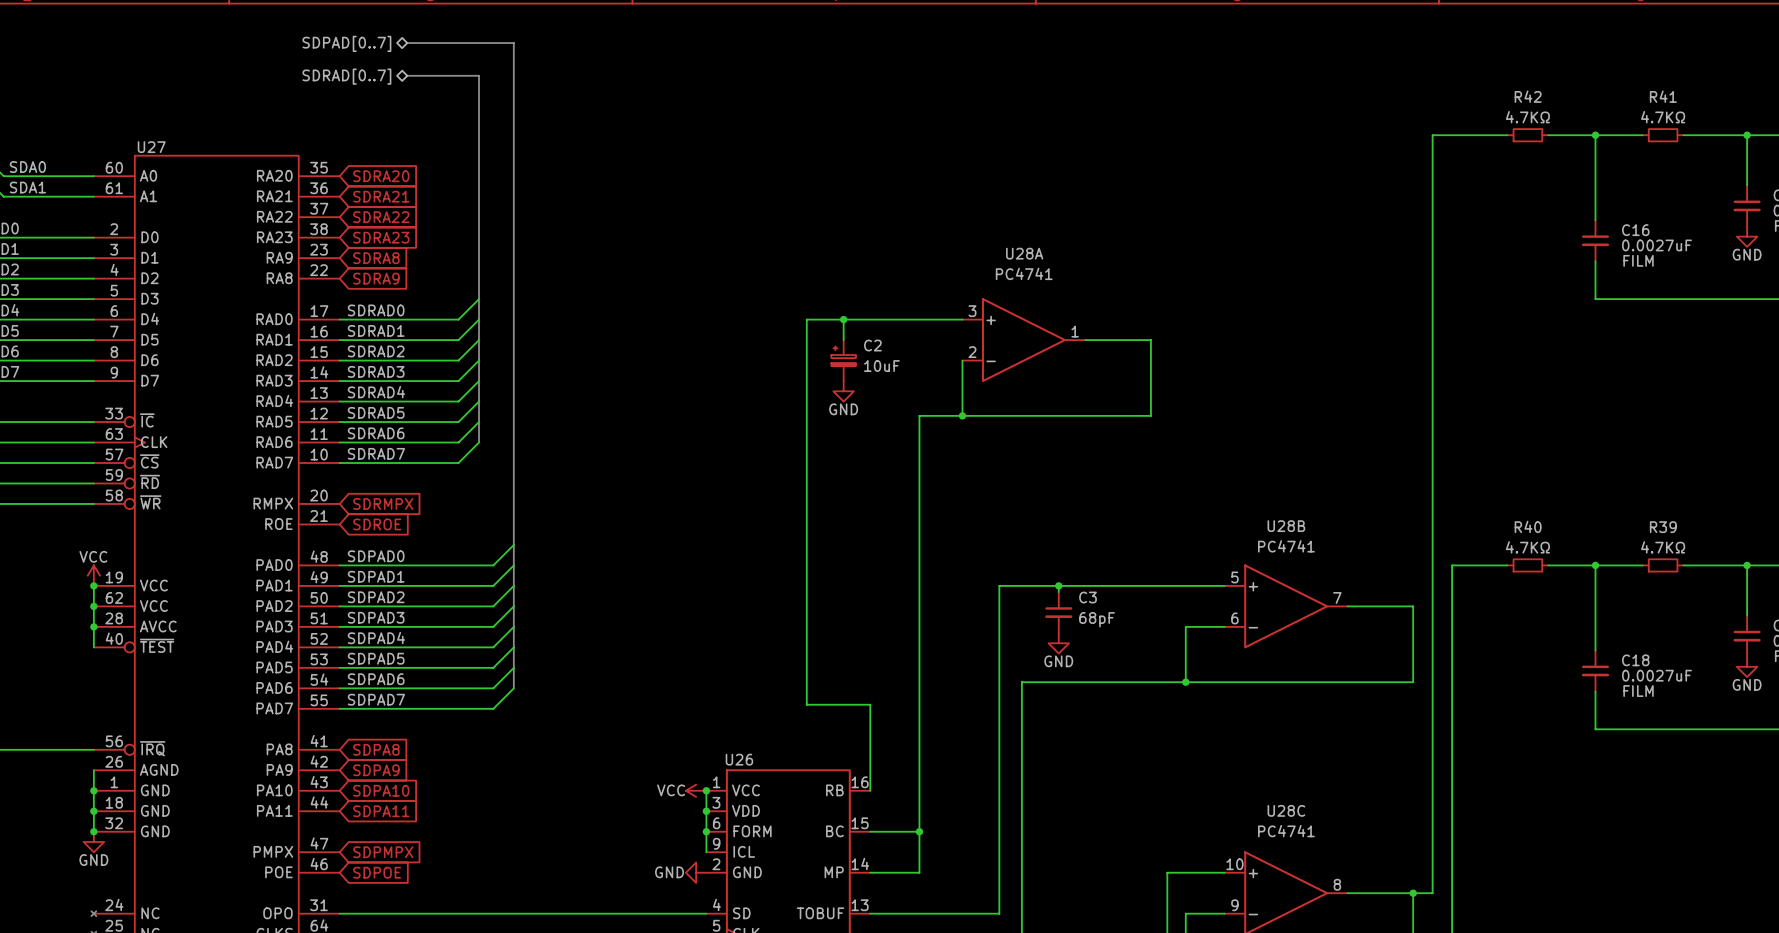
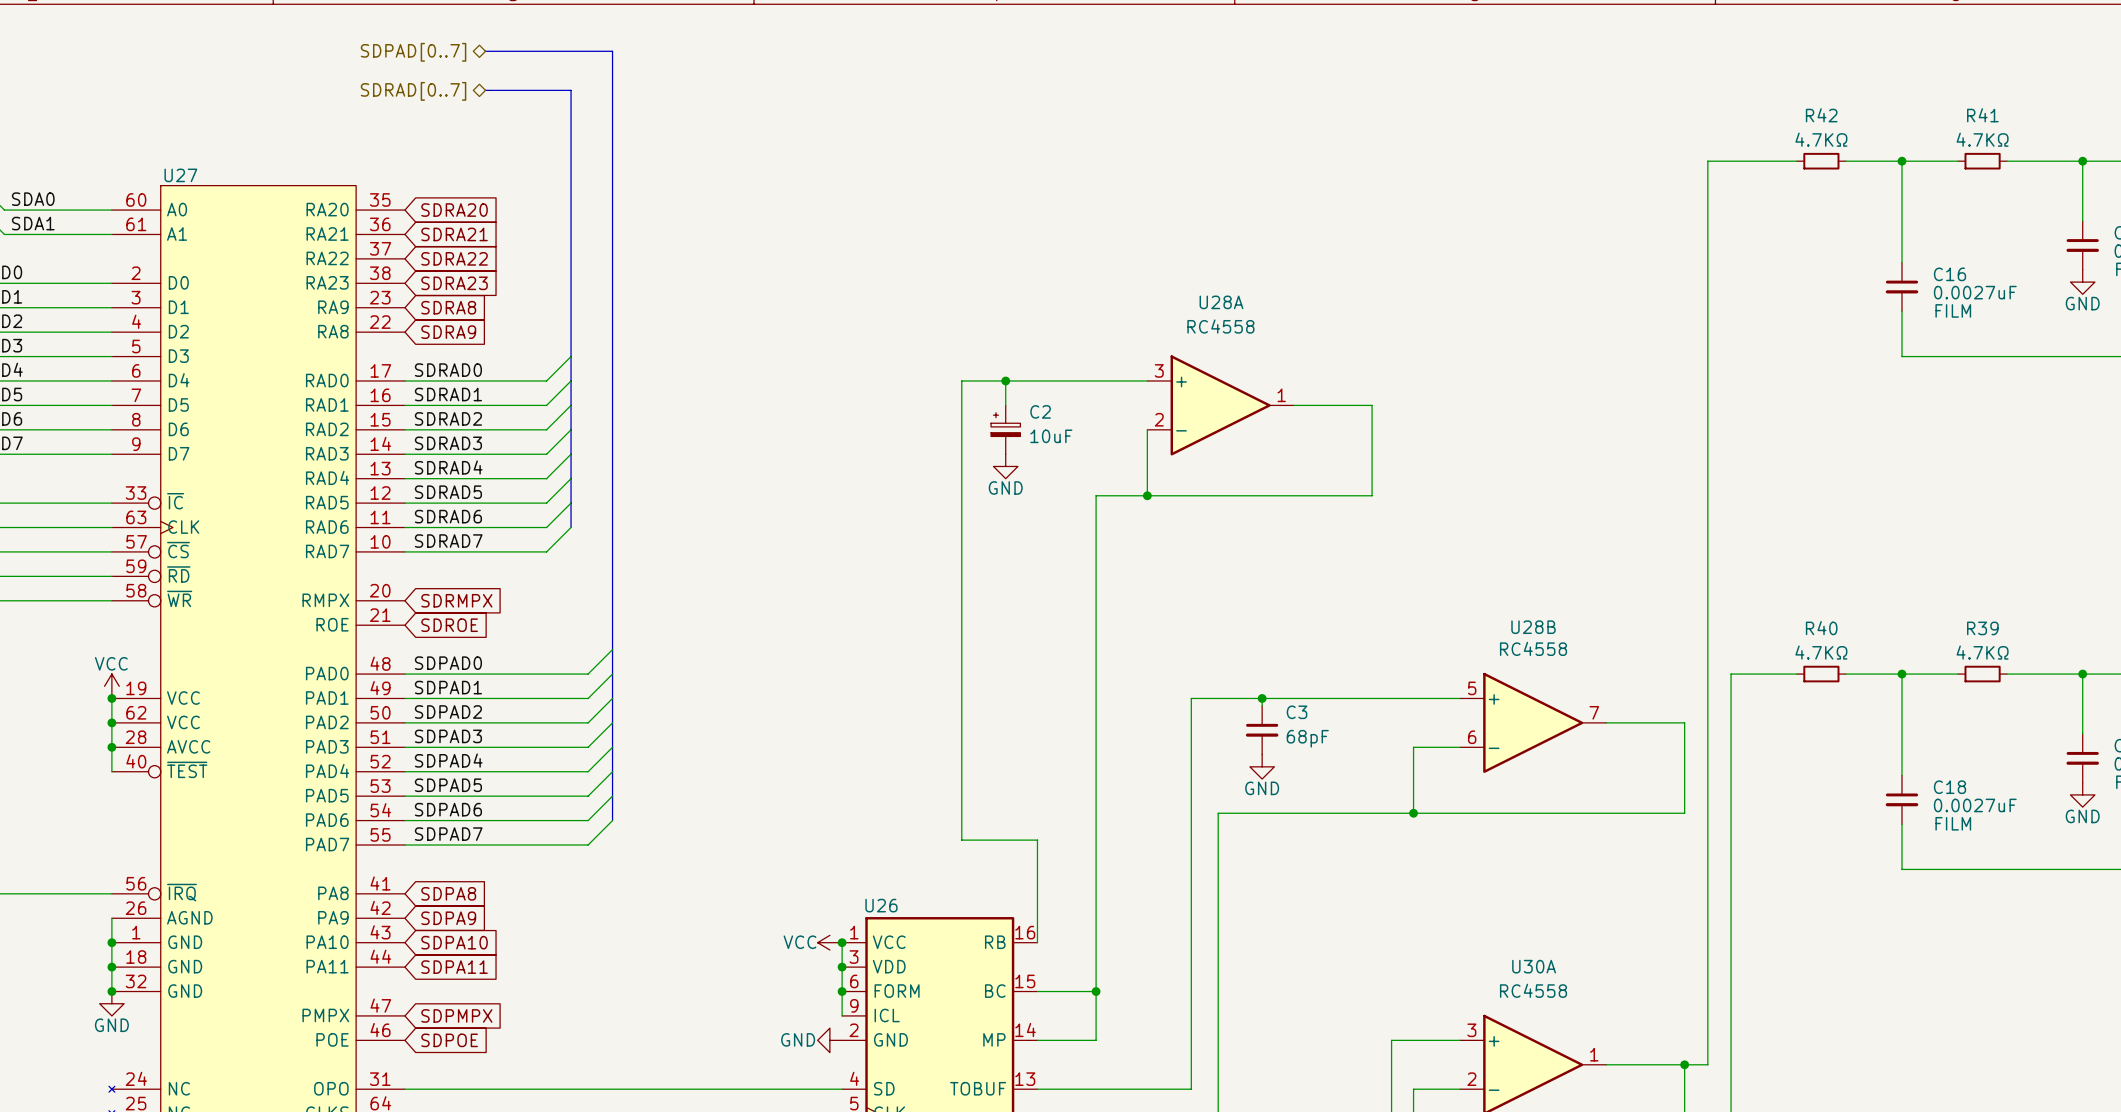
U28A value: PC4741 (1024, 273) -> RC4558 (1220, 326)
U28B value: PC4741 (1286, 546) -> RC4558 (1533, 648)
U28C name: U28C (1286, 810) -> U30A (1534, 966)
U28C value: PC4741 (1286, 831) -> RC4558 (1533, 990)
U28C pin number: 10 (1234, 864) -> 3 (1471, 1030)
U28C pin number: 8 (1337, 884) -> 1 (1594, 1054)
U28C pin number: 9 (1234, 905) -> 2 (1471, 1079)

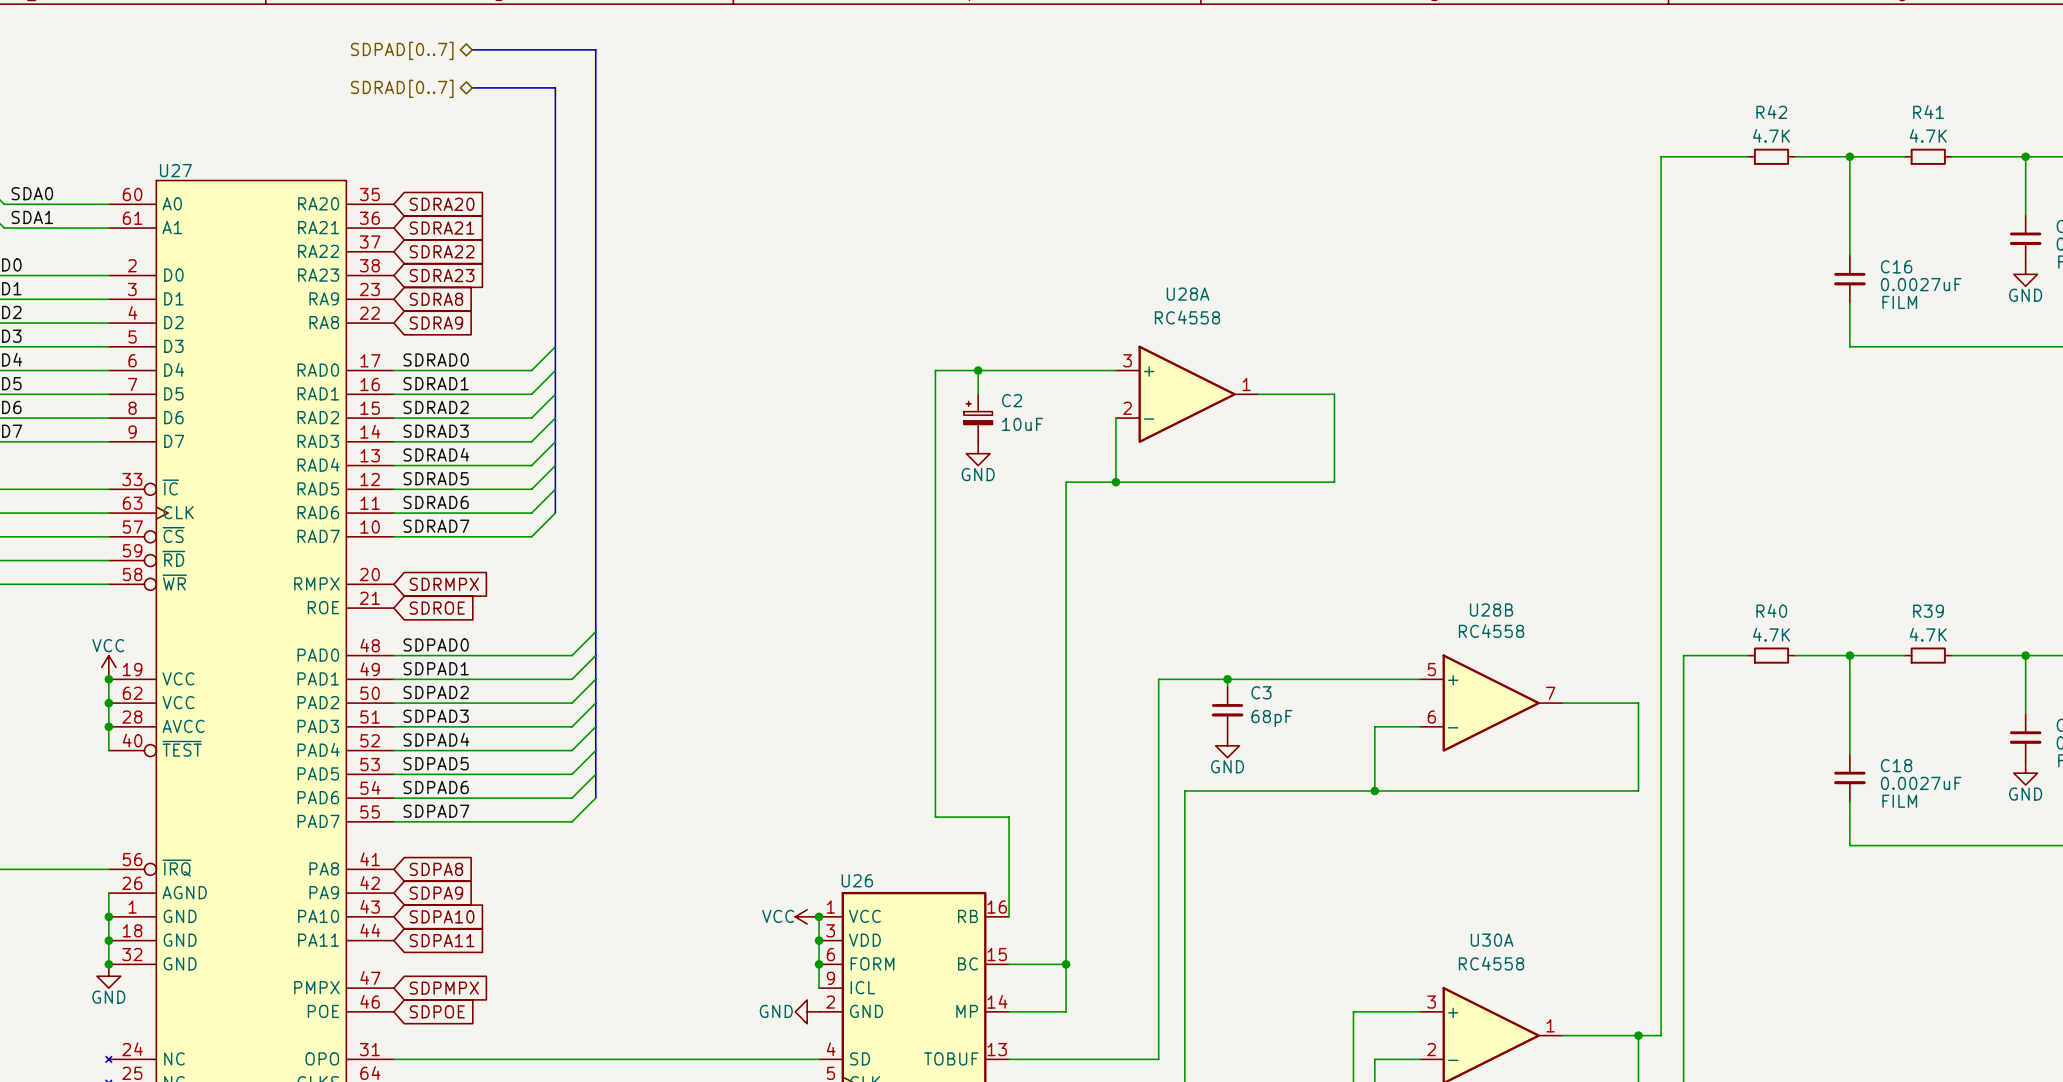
R42 value: 4.7KΩ (1821, 139) -> 4.7K (1771, 135)
R41 value: 4.7KΩ (1982, 139) -> 4.7K (1928, 135)
R40 value: 4.7KΩ (1821, 652) -> 4.7K (1771, 634)
R39 value: 4.7KΩ (1982, 652) -> 4.7K (1928, 634)

